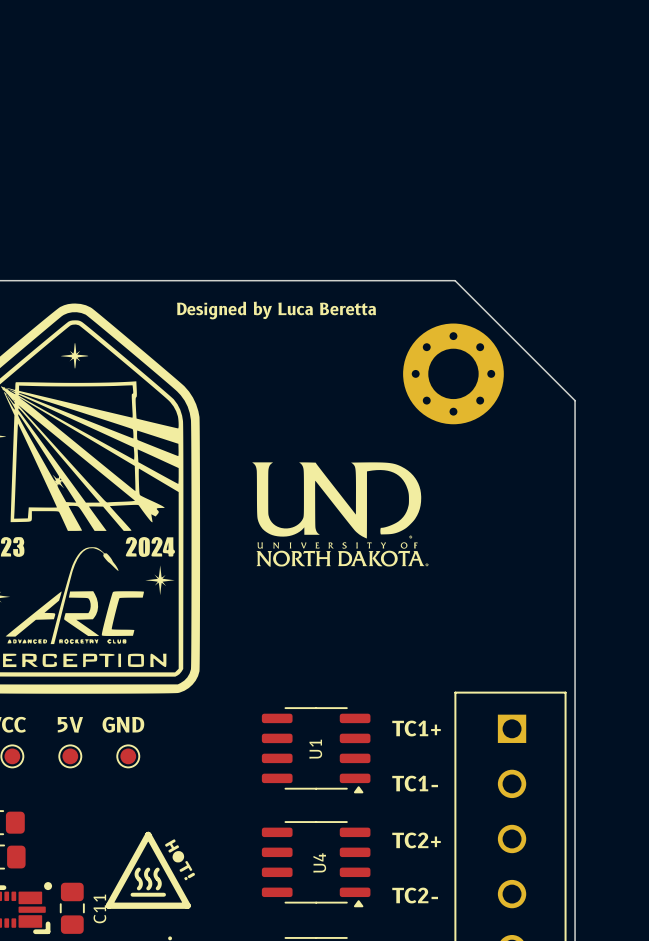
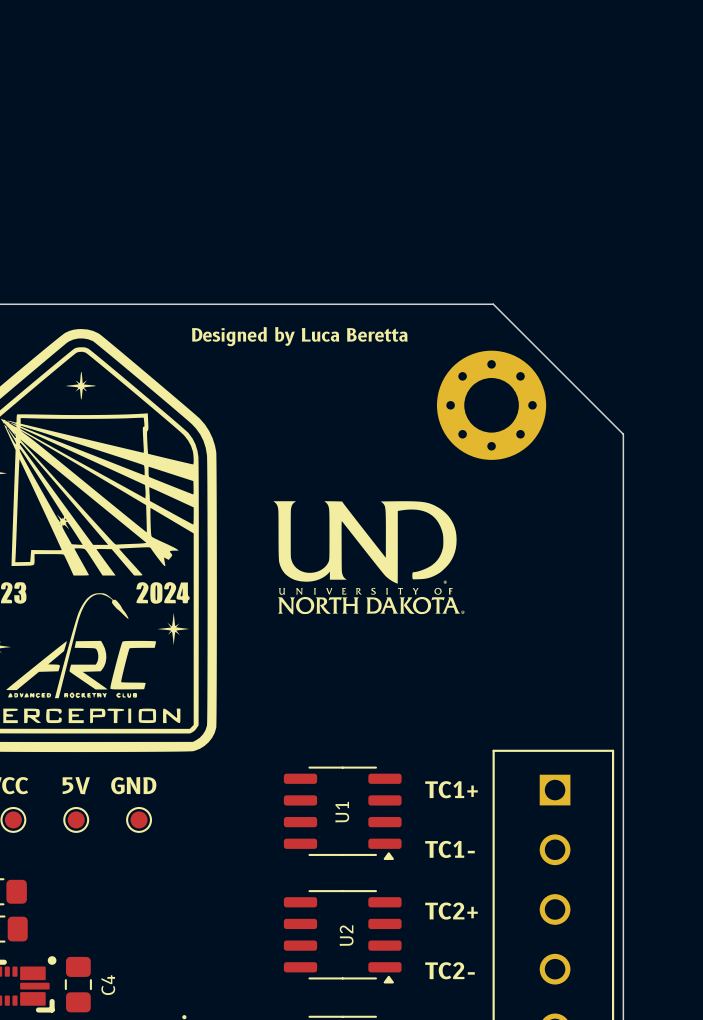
drawing: [105, 831, 195, 909] -> none
U4 name: U4 (319, 862) -> U2 (346, 935)
C11 name: C11 (99, 908) -> C4 (108, 985)

